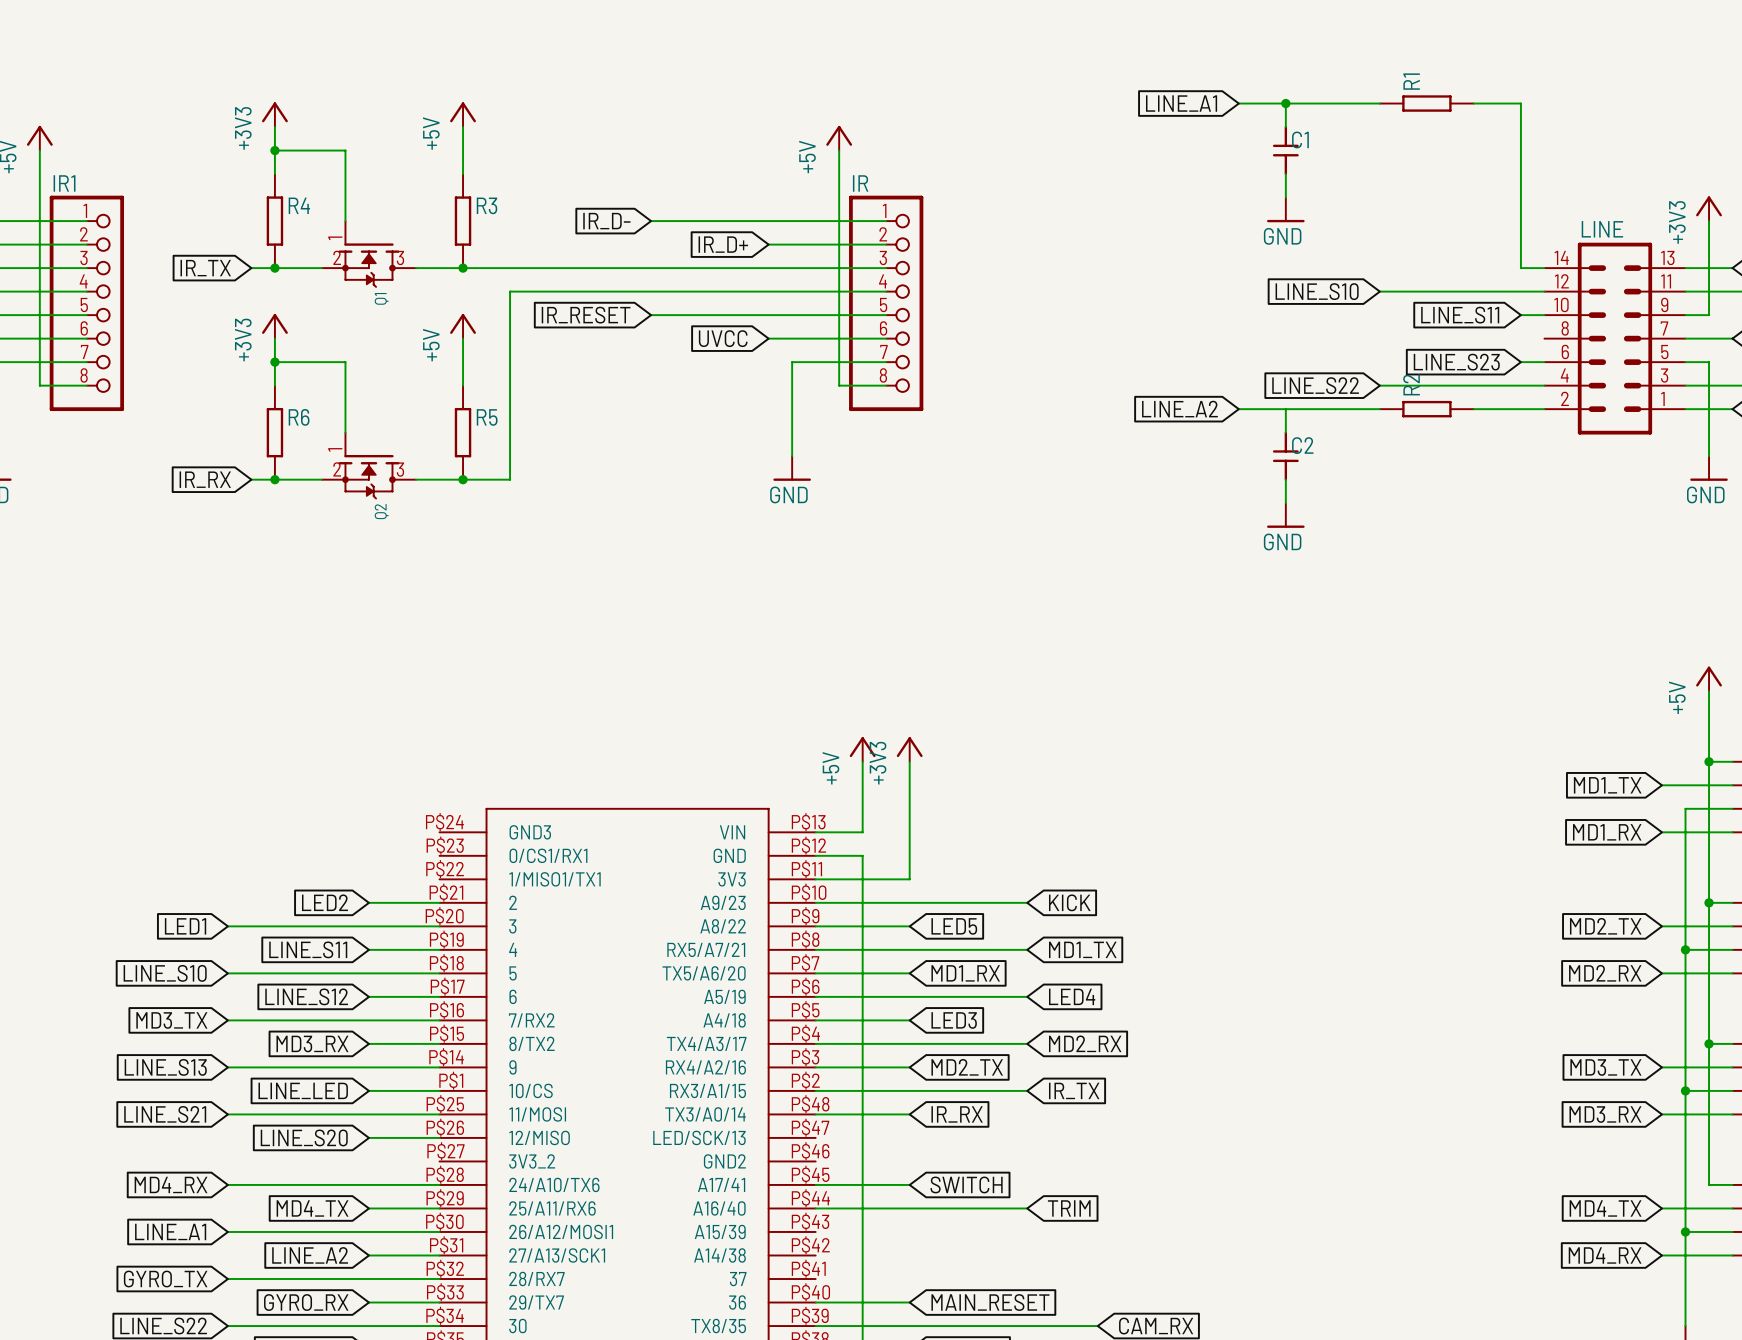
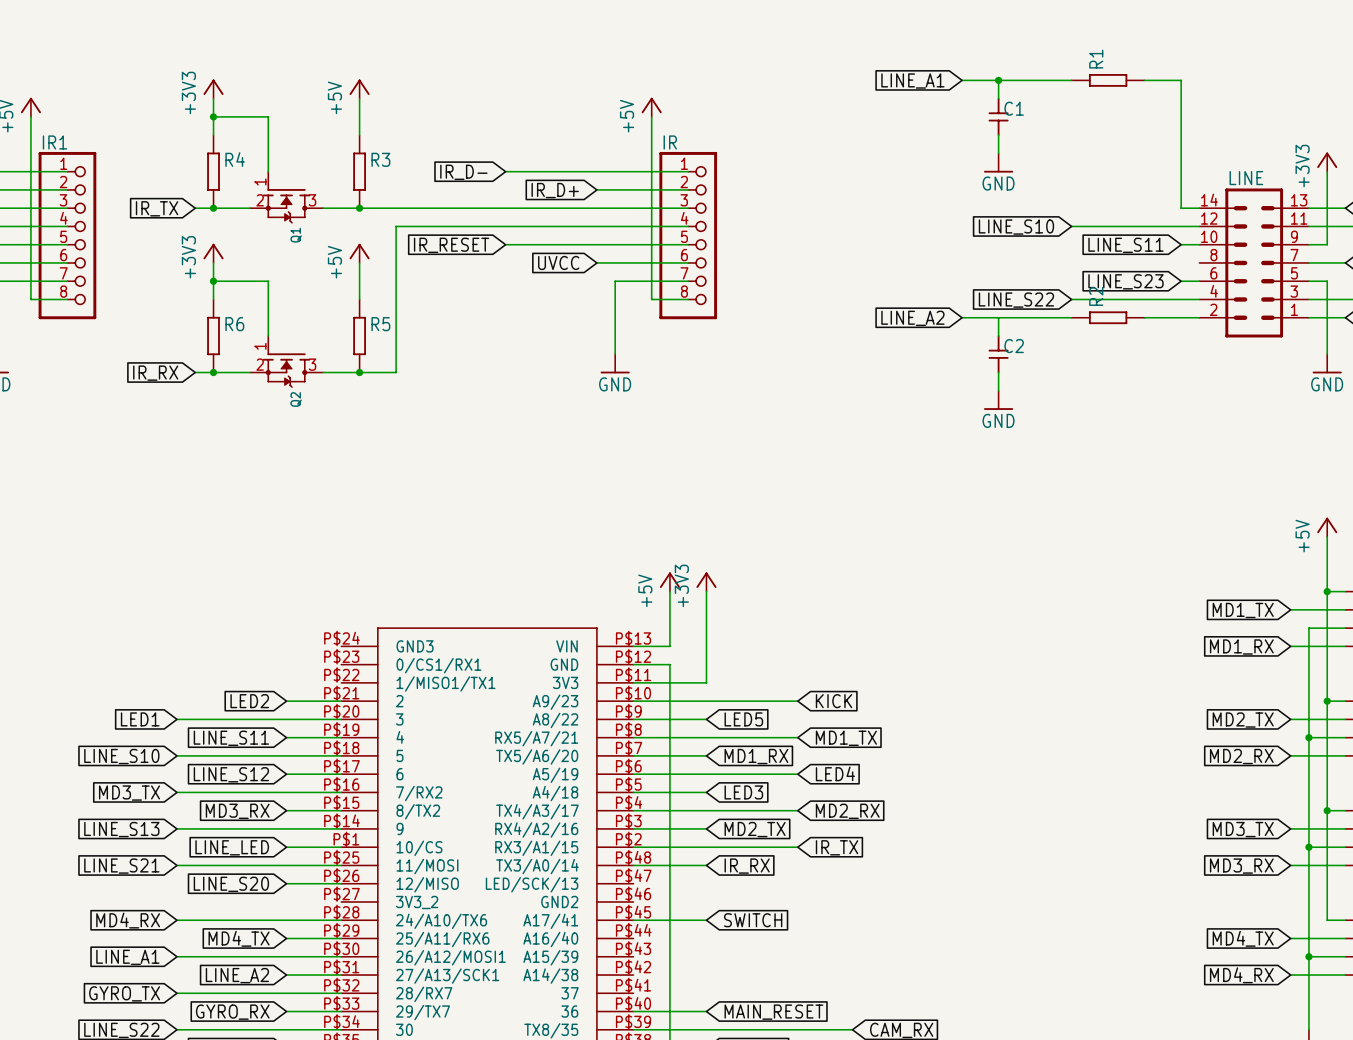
wire: (815, 1208) (1027, 1208) -> none
global label: TRIM (1069, 1208) -> none

